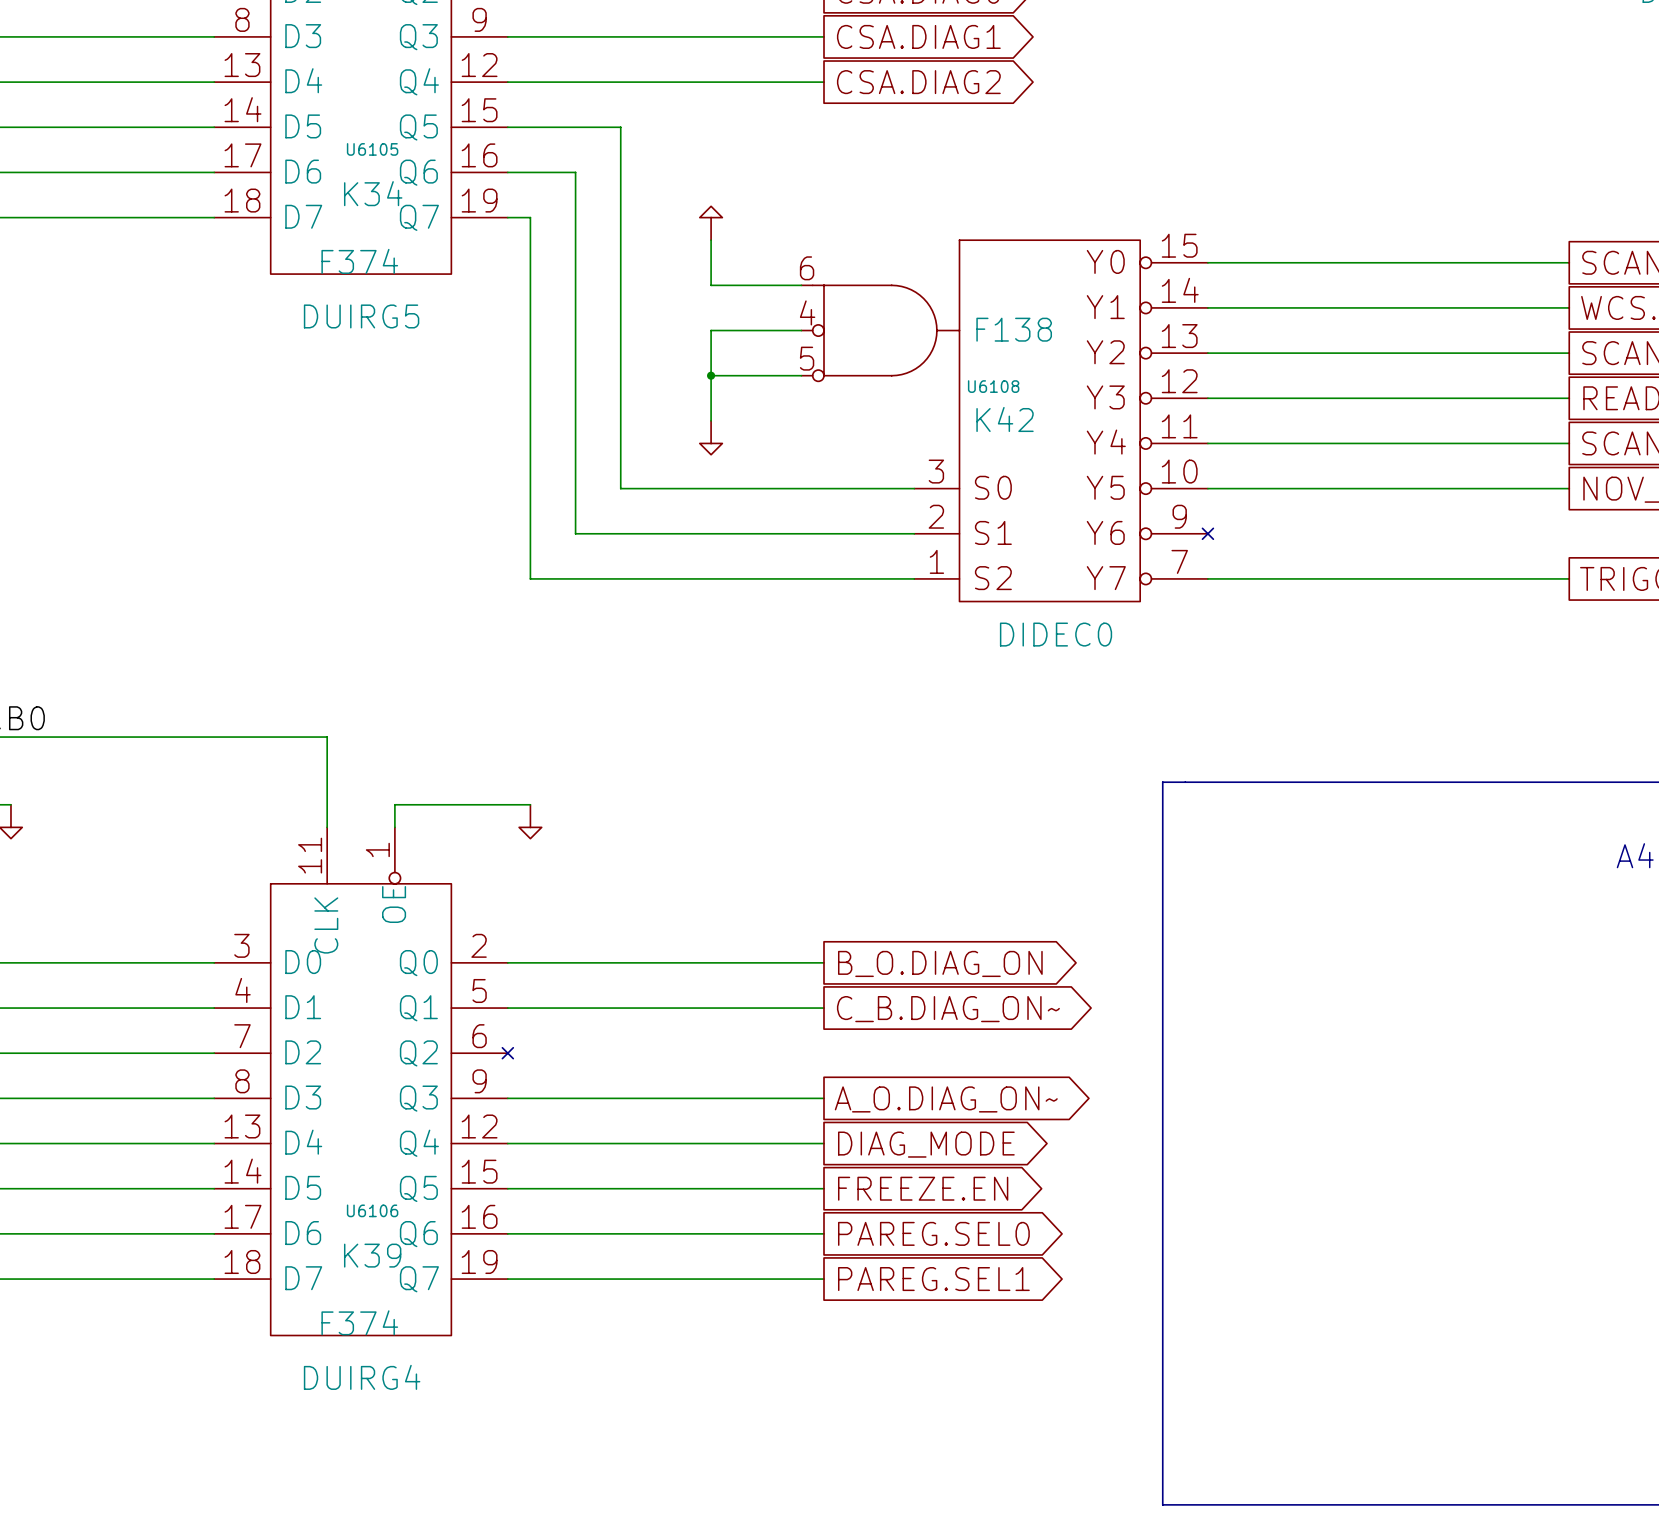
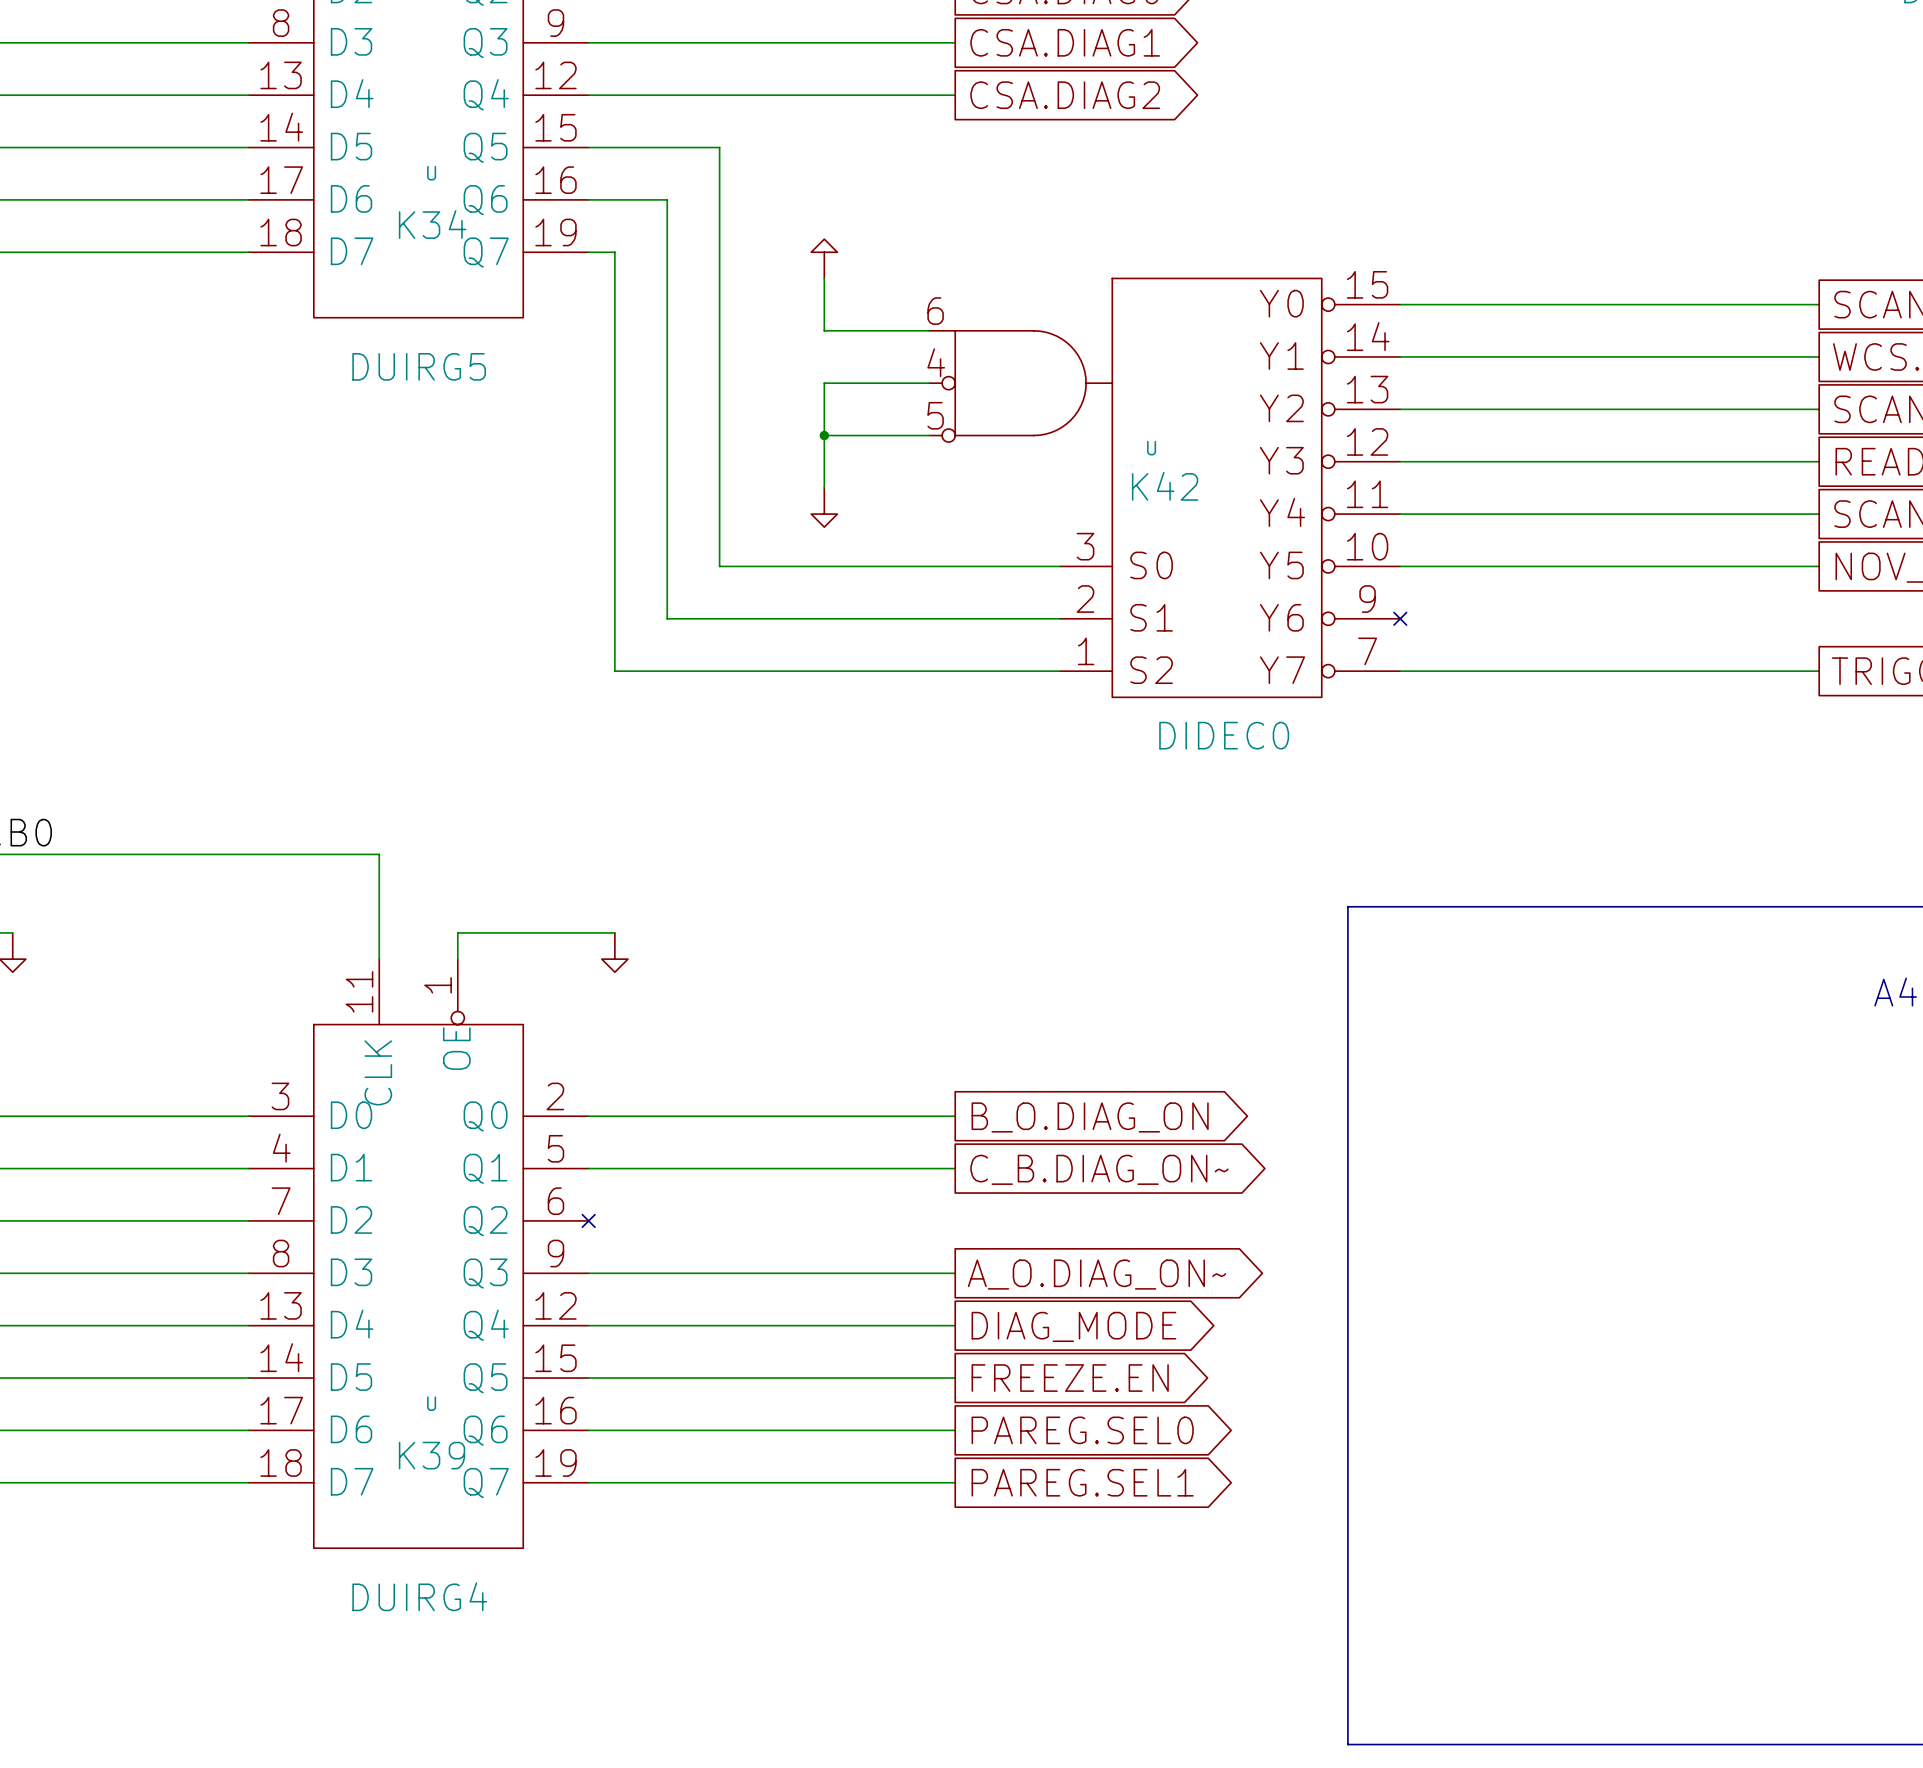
U6105 name: U6105 (372, 149) -> U (431, 173)
U6105 value: F374 (359, 261) -> none
U6108 value: F138 (1014, 329) -> none
U6108 name: U6108 (993, 386) -> U (1151, 448)
U6106 name: U6106 (372, 1210) -> U (431, 1403)
U6106 value: F374 (359, 1322) -> none

